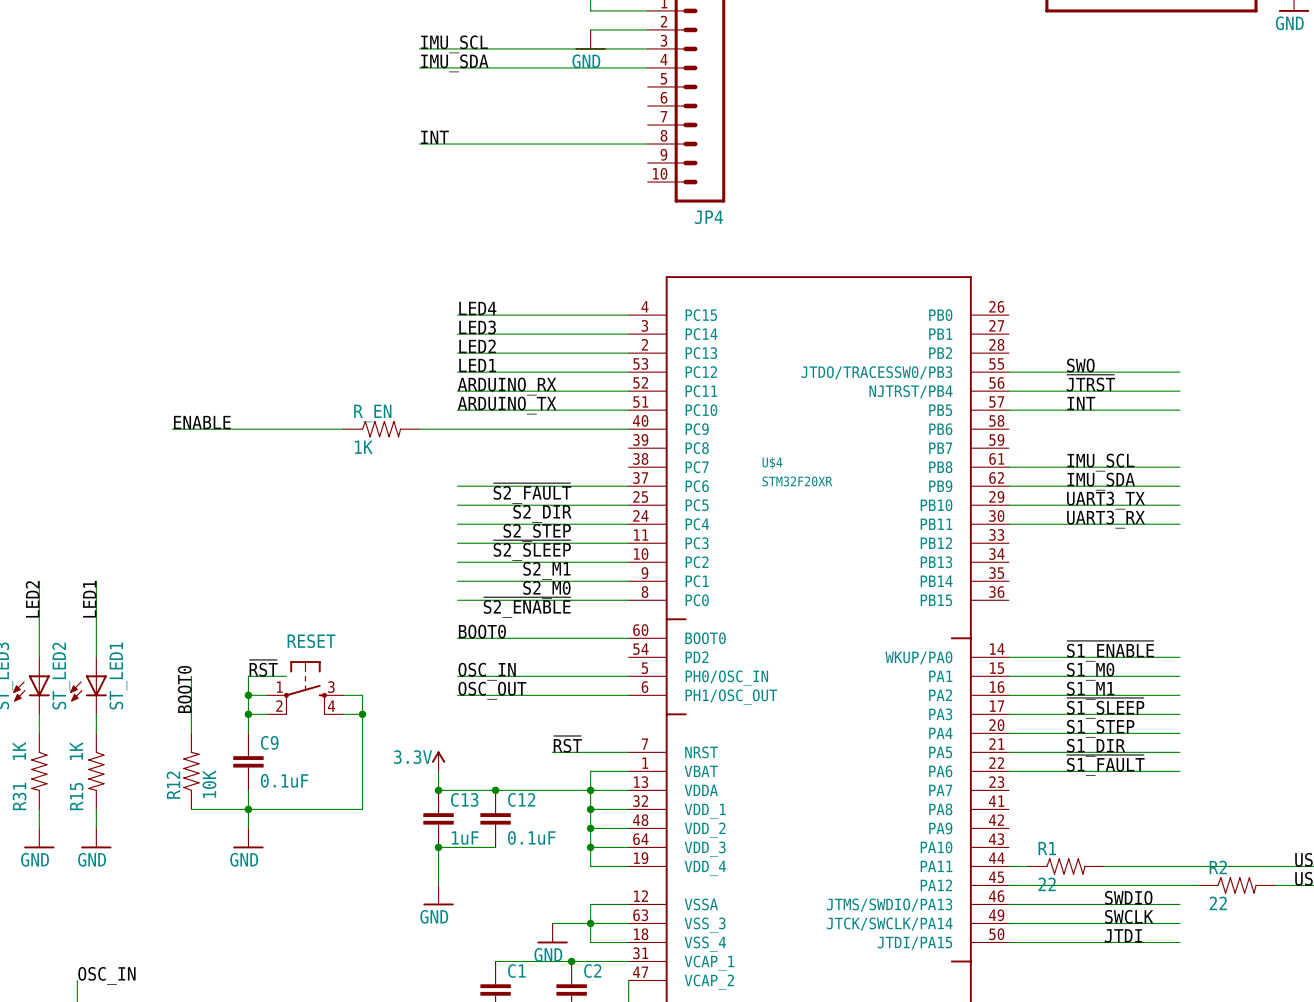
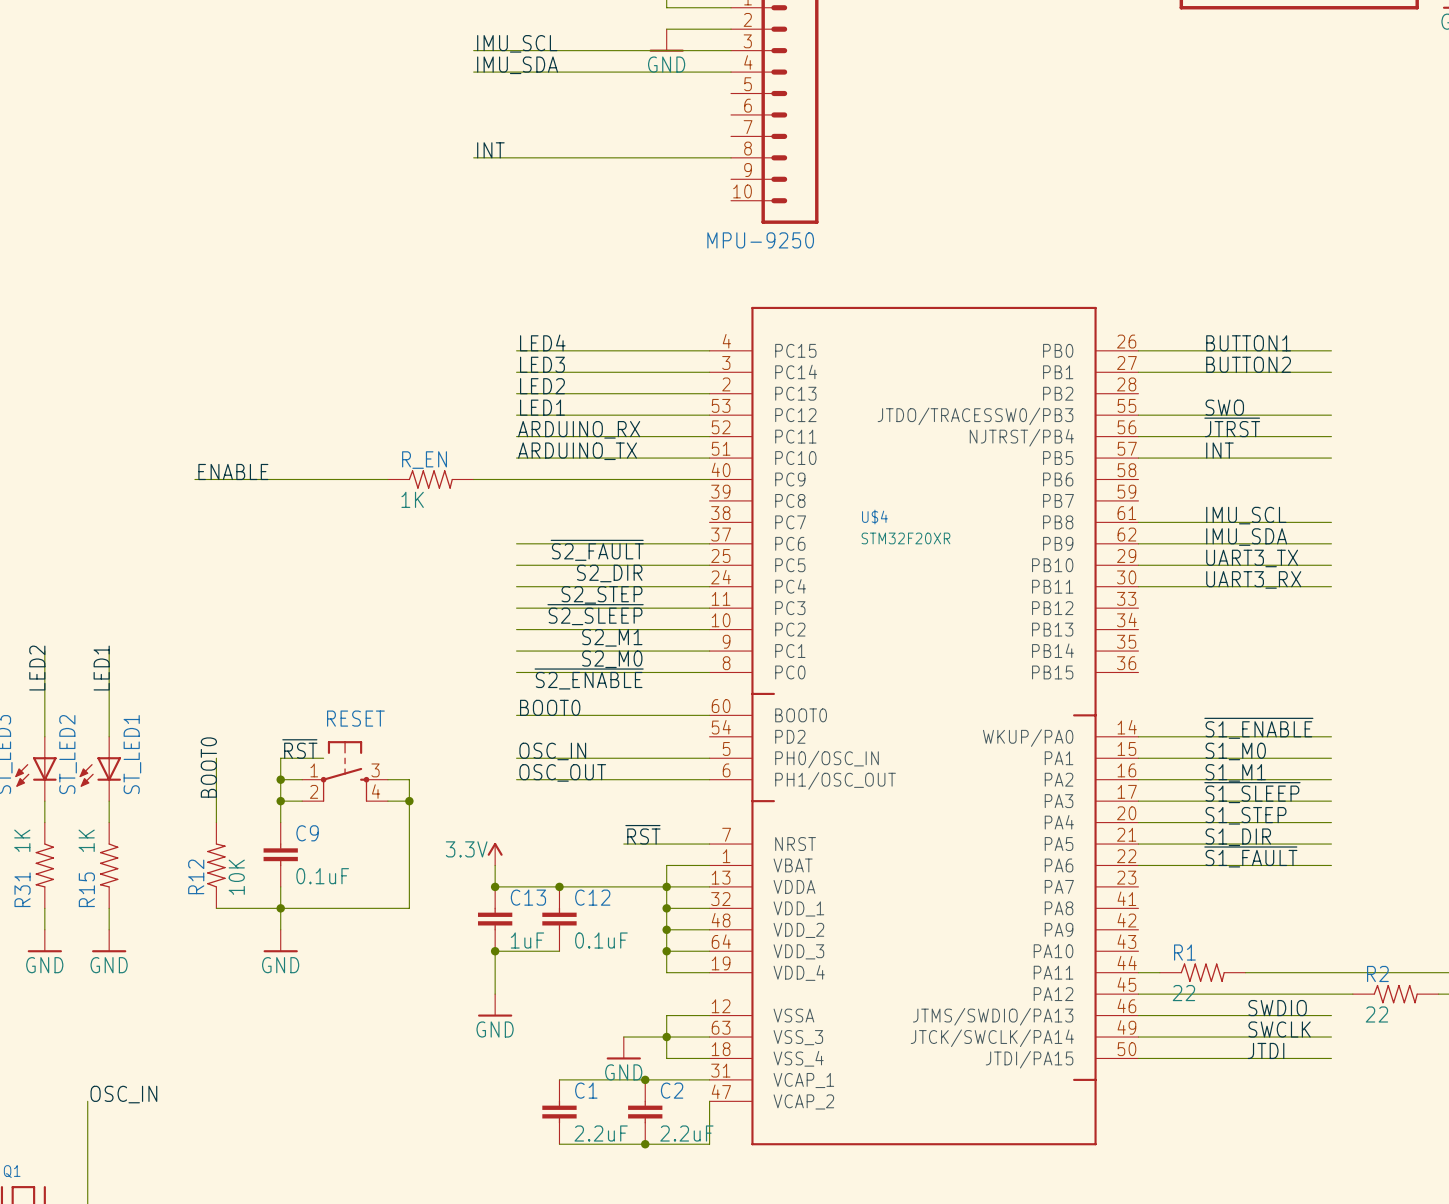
JP4 name: JP4 (708, 217) -> MPU-9250 (760, 240)
label: none -> BUTTON1 (1248, 343)
wire: none -> (1138, 350) (1331, 350)
label: none -> BUTTON2 (1248, 364)
wire: none -> (1138, 372) (1331, 372)

